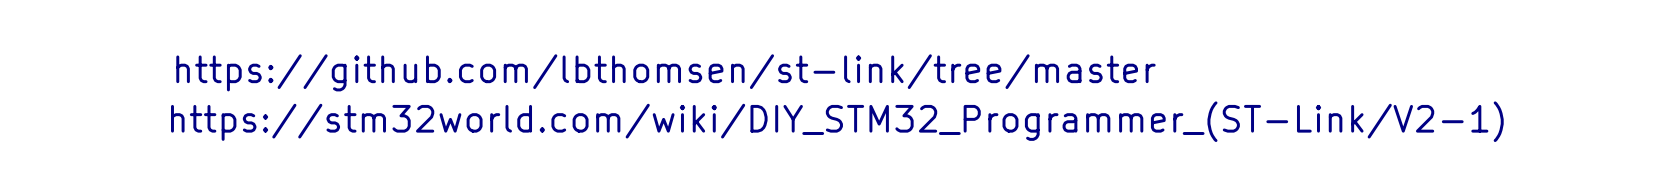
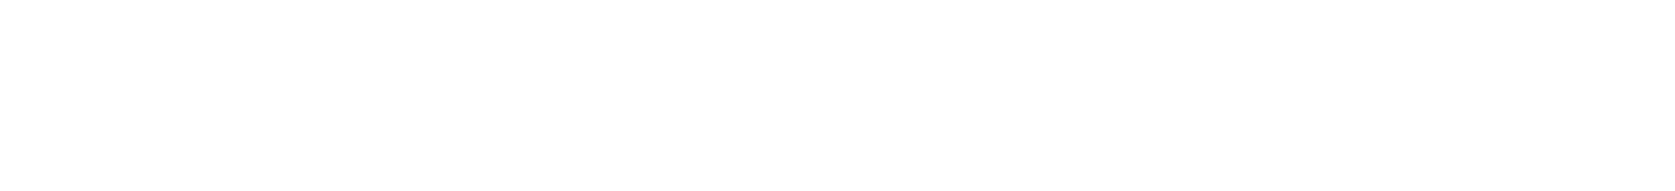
text: https://github.com/lbthomsen/st-link/tree/master (665, 72) -> none
text: https://stm32world.com/wiki/DIY_STM32_Programmer_(ST-Link/V2-1) (837, 121) -> none

